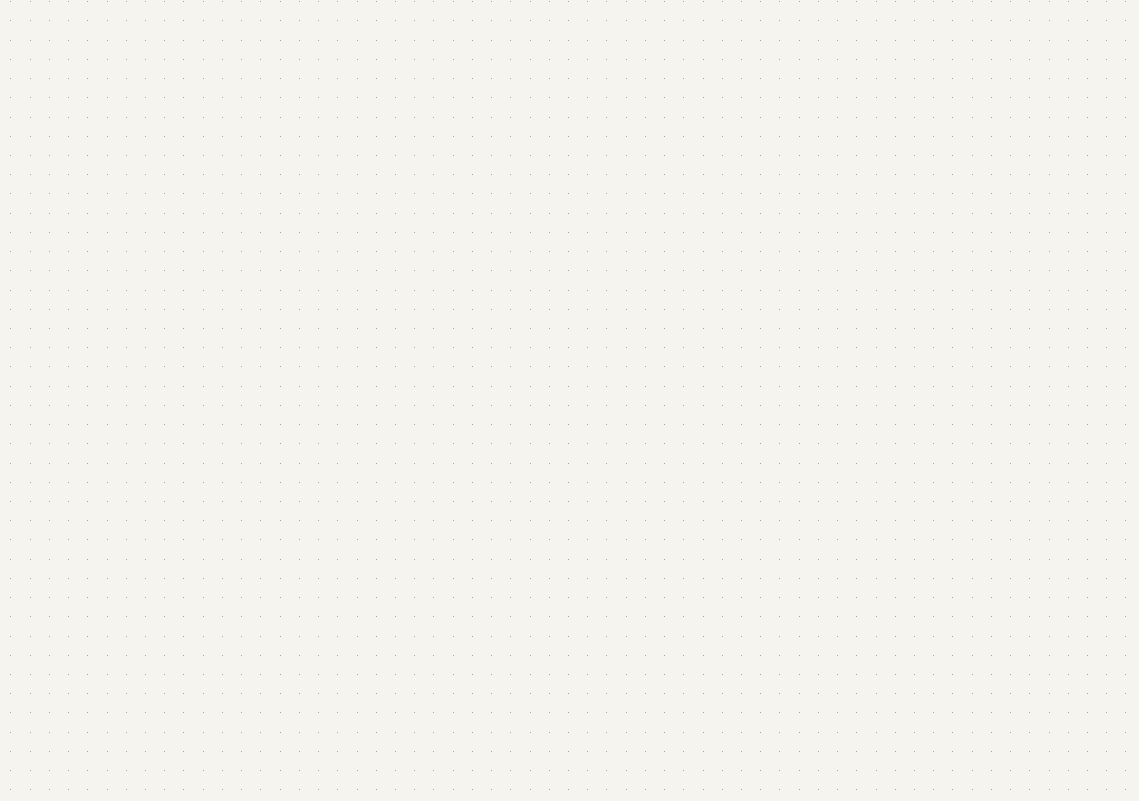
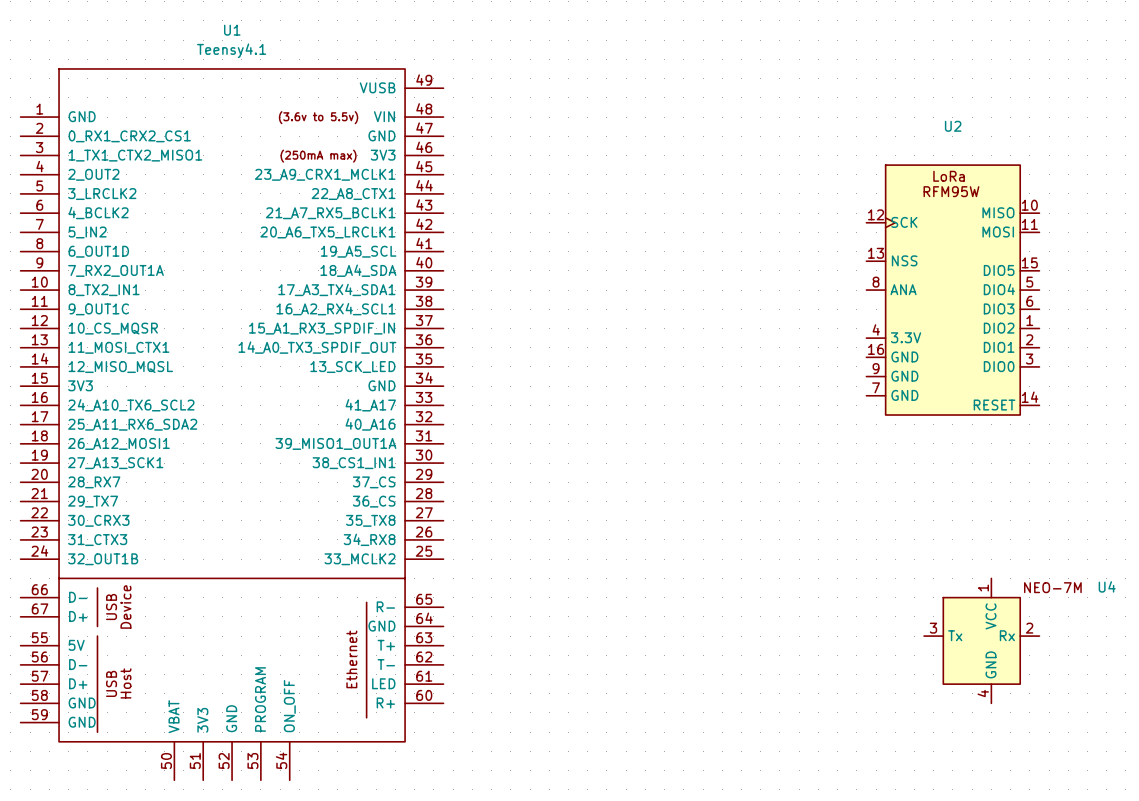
U2: none -> (952, 290)
U1: none -> Teensy4.1 (232, 424)
U4: none -> (981, 640)

